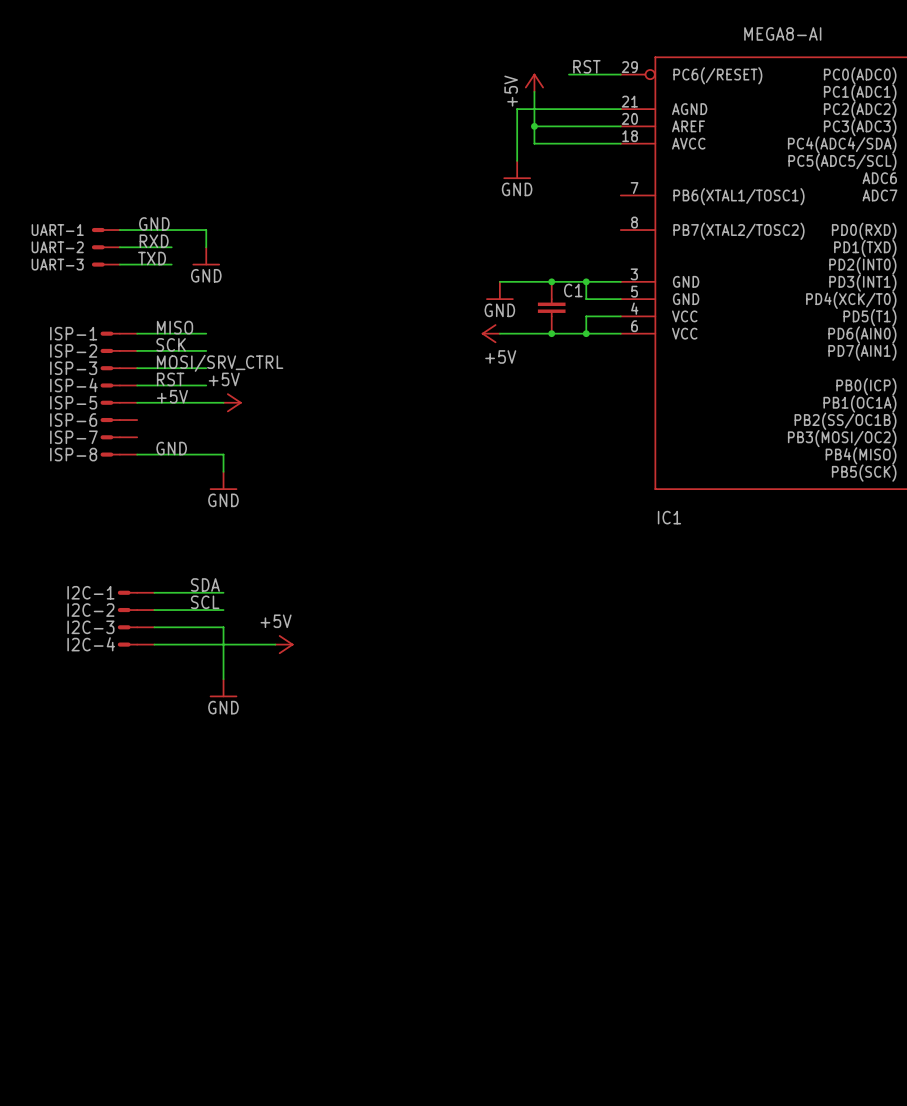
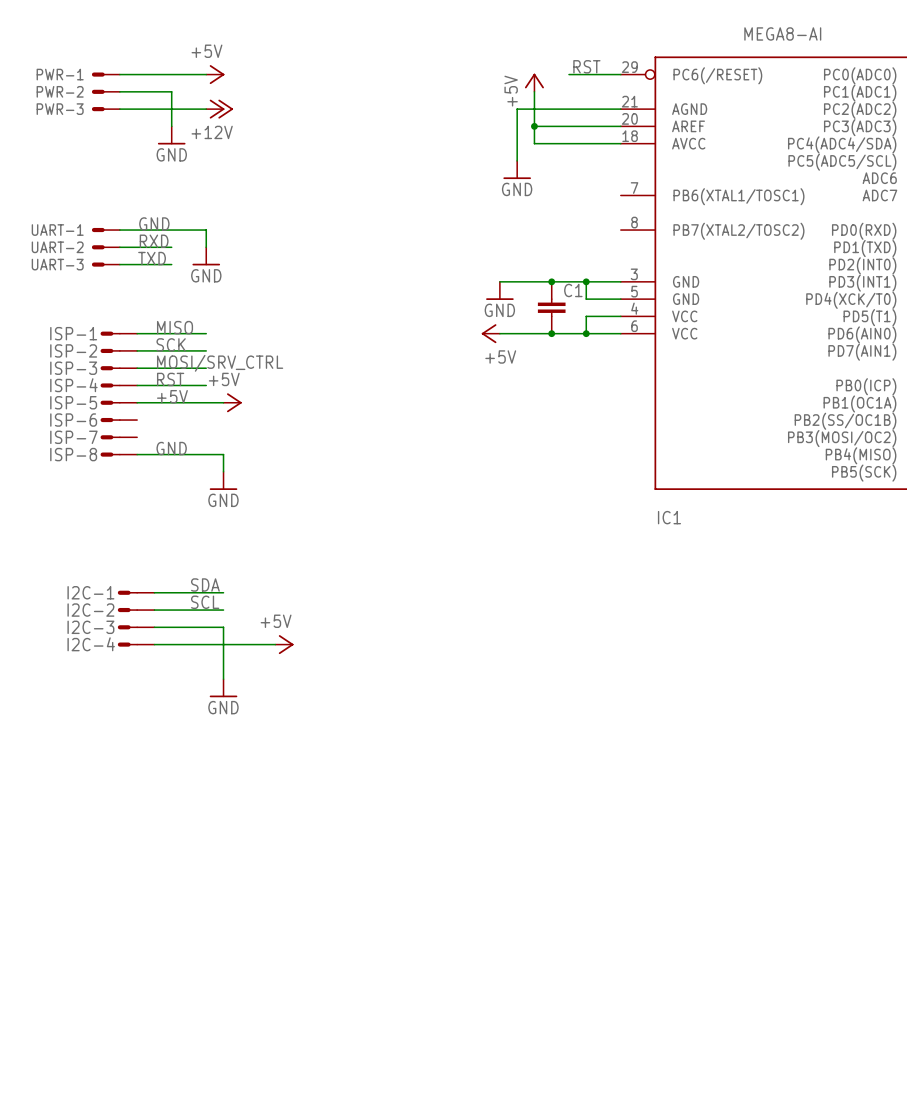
PWR-1: none -> (105, 74)
wire: none -> (119, 74) (206, 74)
power symbol: none -> +5V (215, 74)
PWR-2: none -> (105, 91)
wire: none -> (119, 91) (171, 91) (171, 126)
PWR-3: none -> (105, 109)
wire: none -> (119, 109) (206, 109)
power symbol: none -> +12V (219, 109)
power symbol: none -> GND (171, 135)

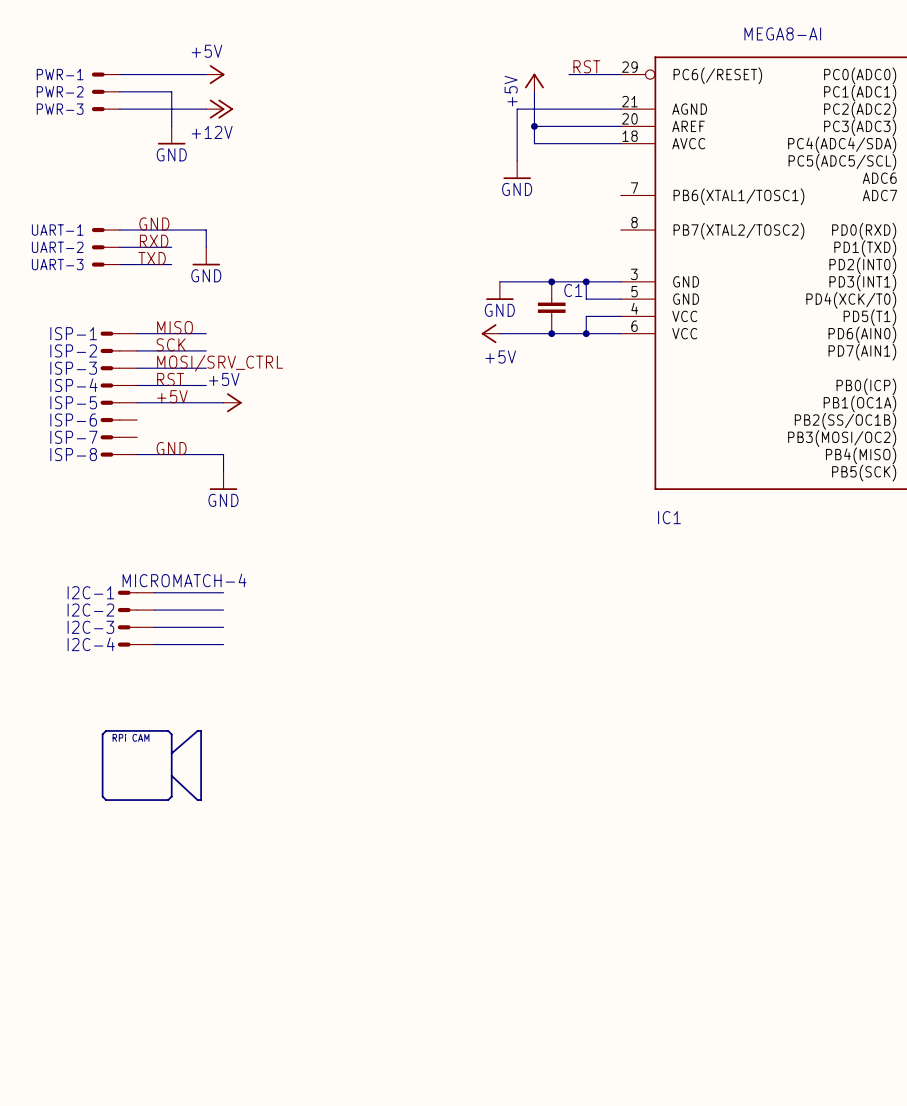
I2C-1 value: none -> MICROMATCH-4 (184, 580)
label: SDA (205, 584) -> none
label: SCL (205, 602) -> none
wire: (223, 627) (223, 679) -> none
wire: (223, 644) (275, 644) -> none
power symbol: +5V (284, 644) -> none
power symbol: GND (223, 688) -> none
part: none -> (151, 765)

